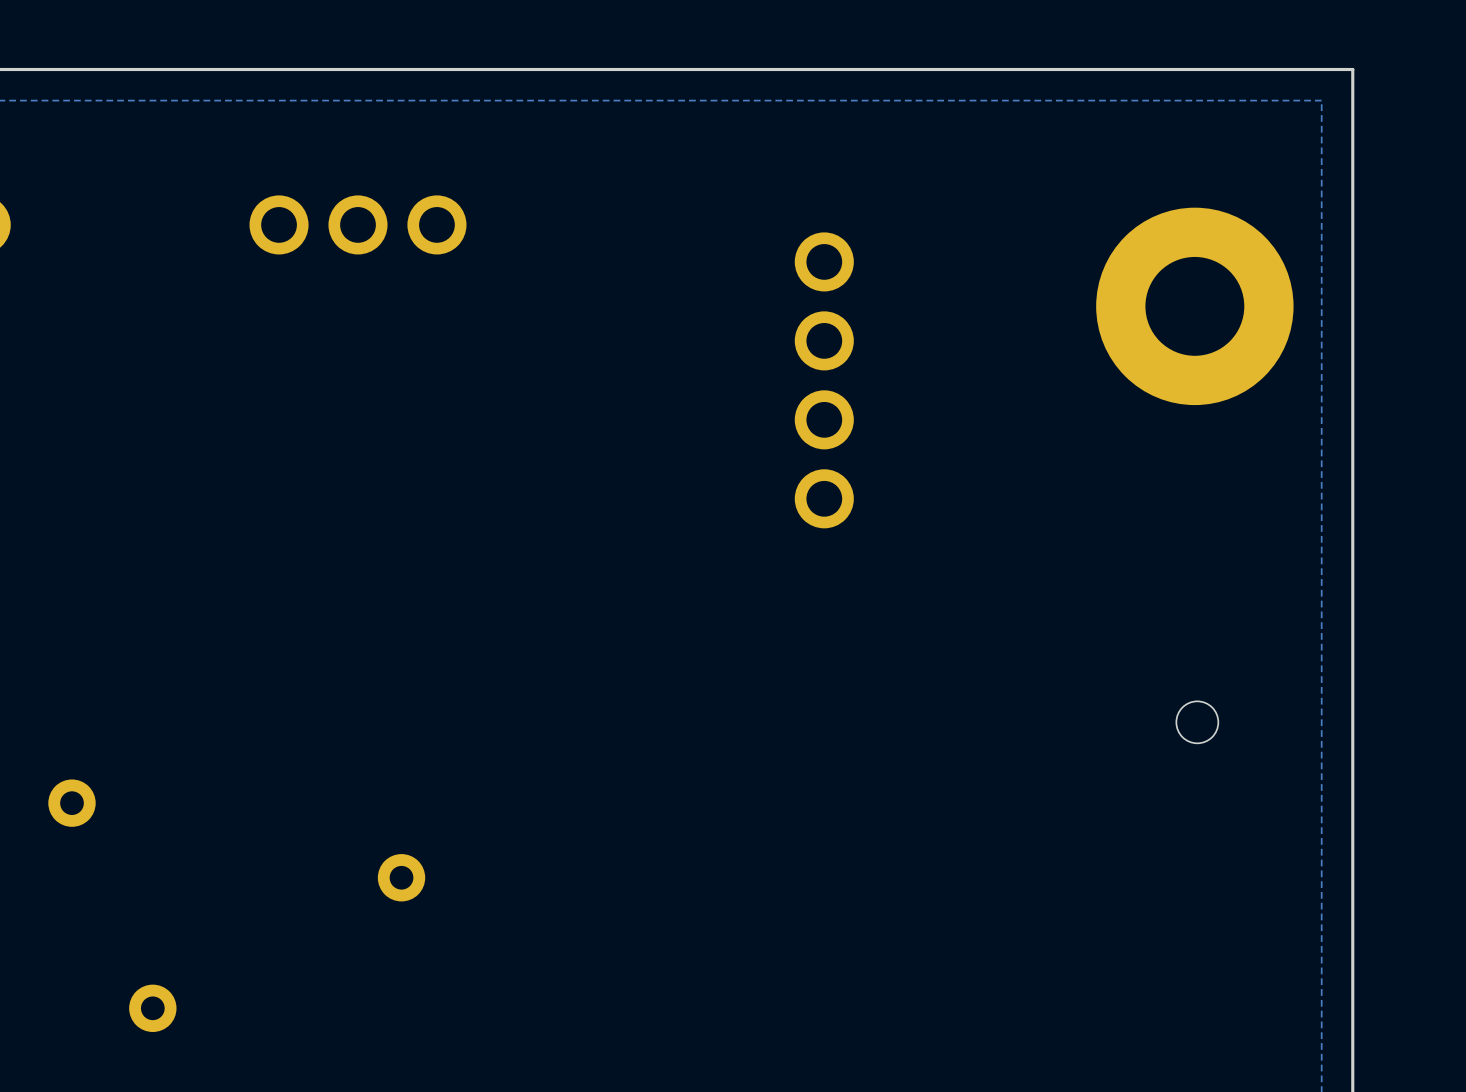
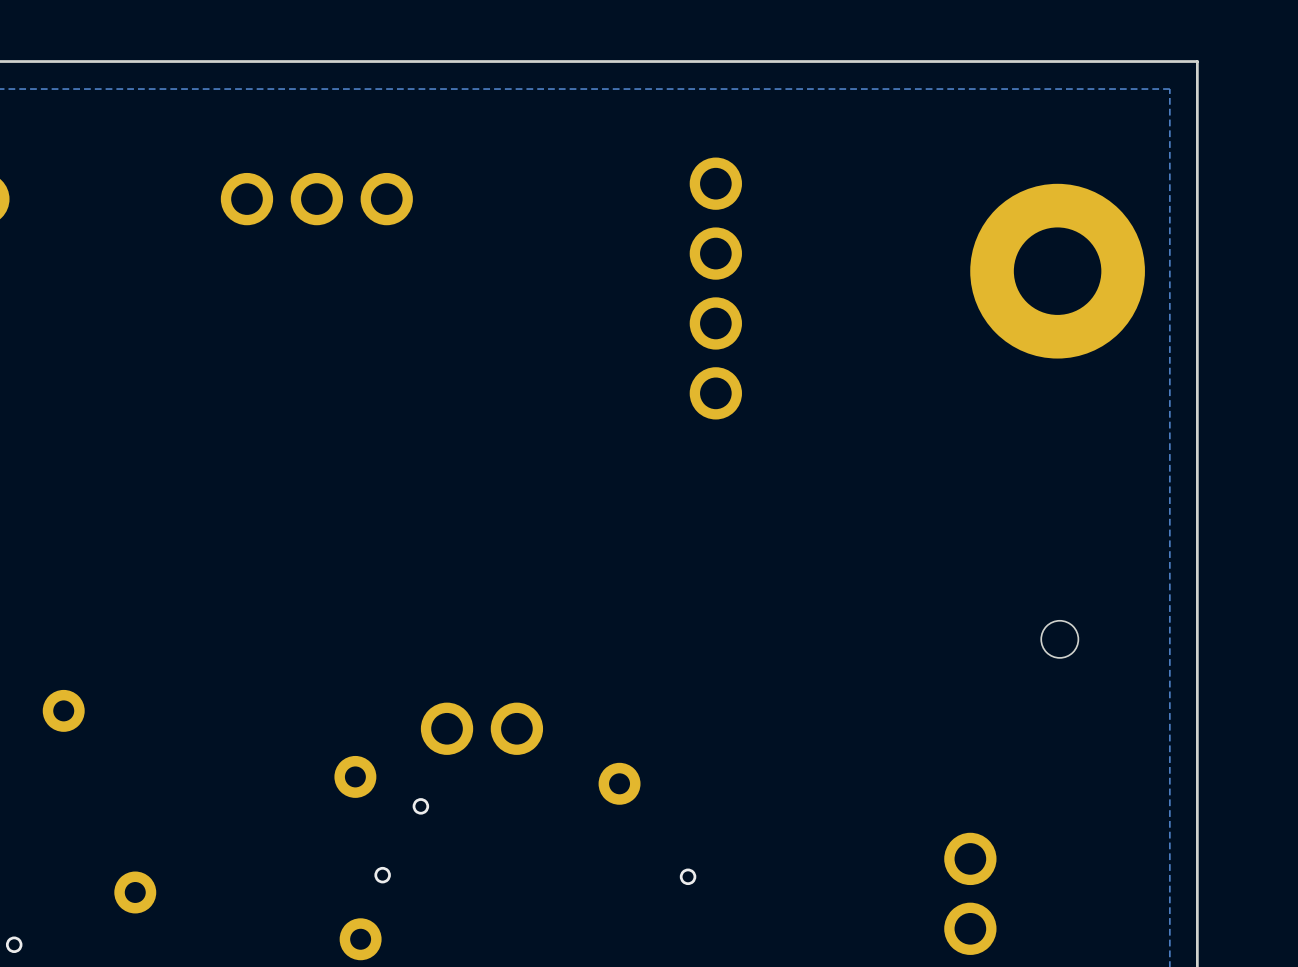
part position: (824, 380) -> (715, 288)
part: none -> (481, 728)
part: none -> (619, 783)
via: none -> (420, 806)
via: none -> (382, 875)
via: none -> (688, 876)
part: none -> (970, 893)
part: none -> (360, 939)
via: none -> (14, 944)

